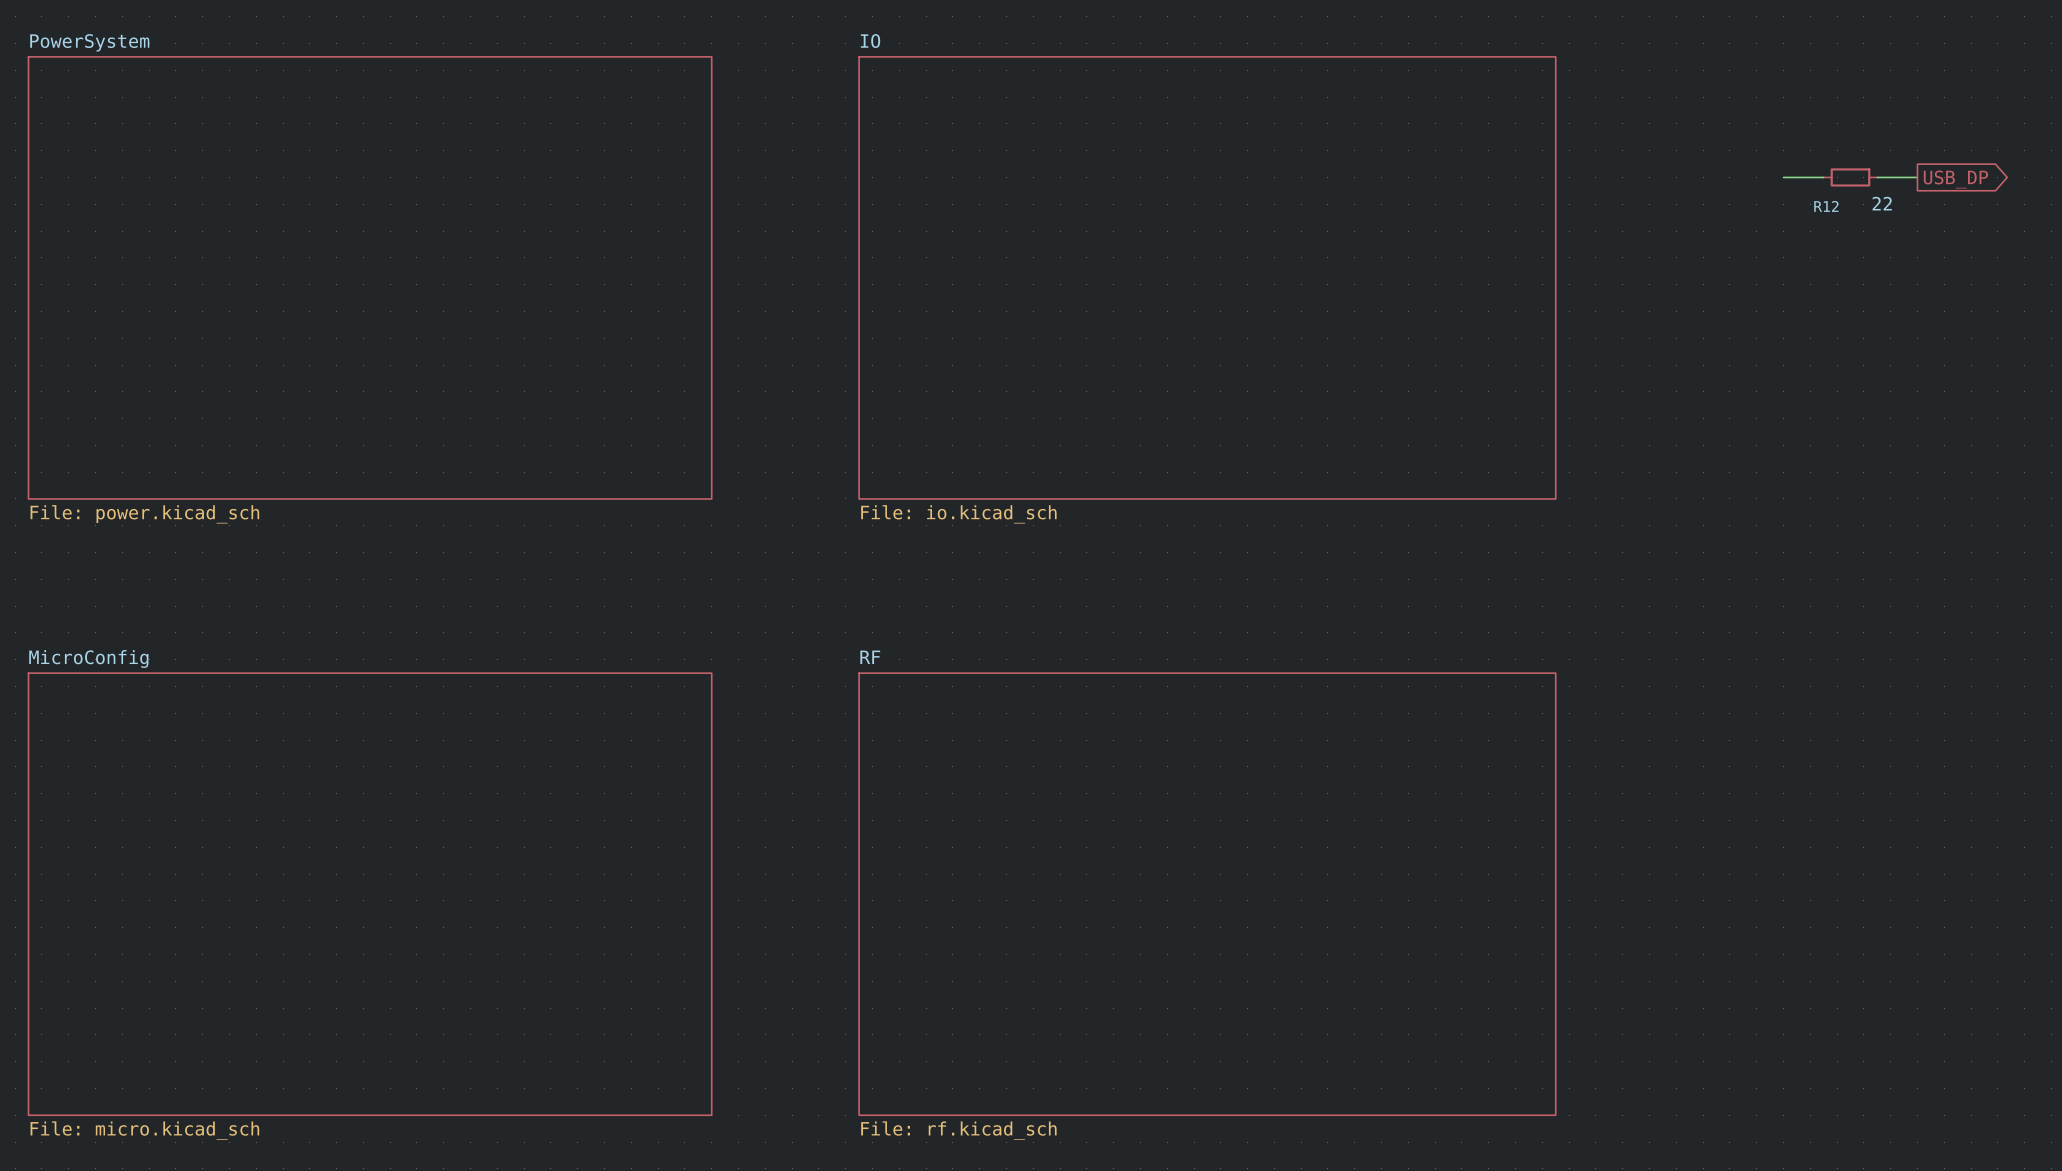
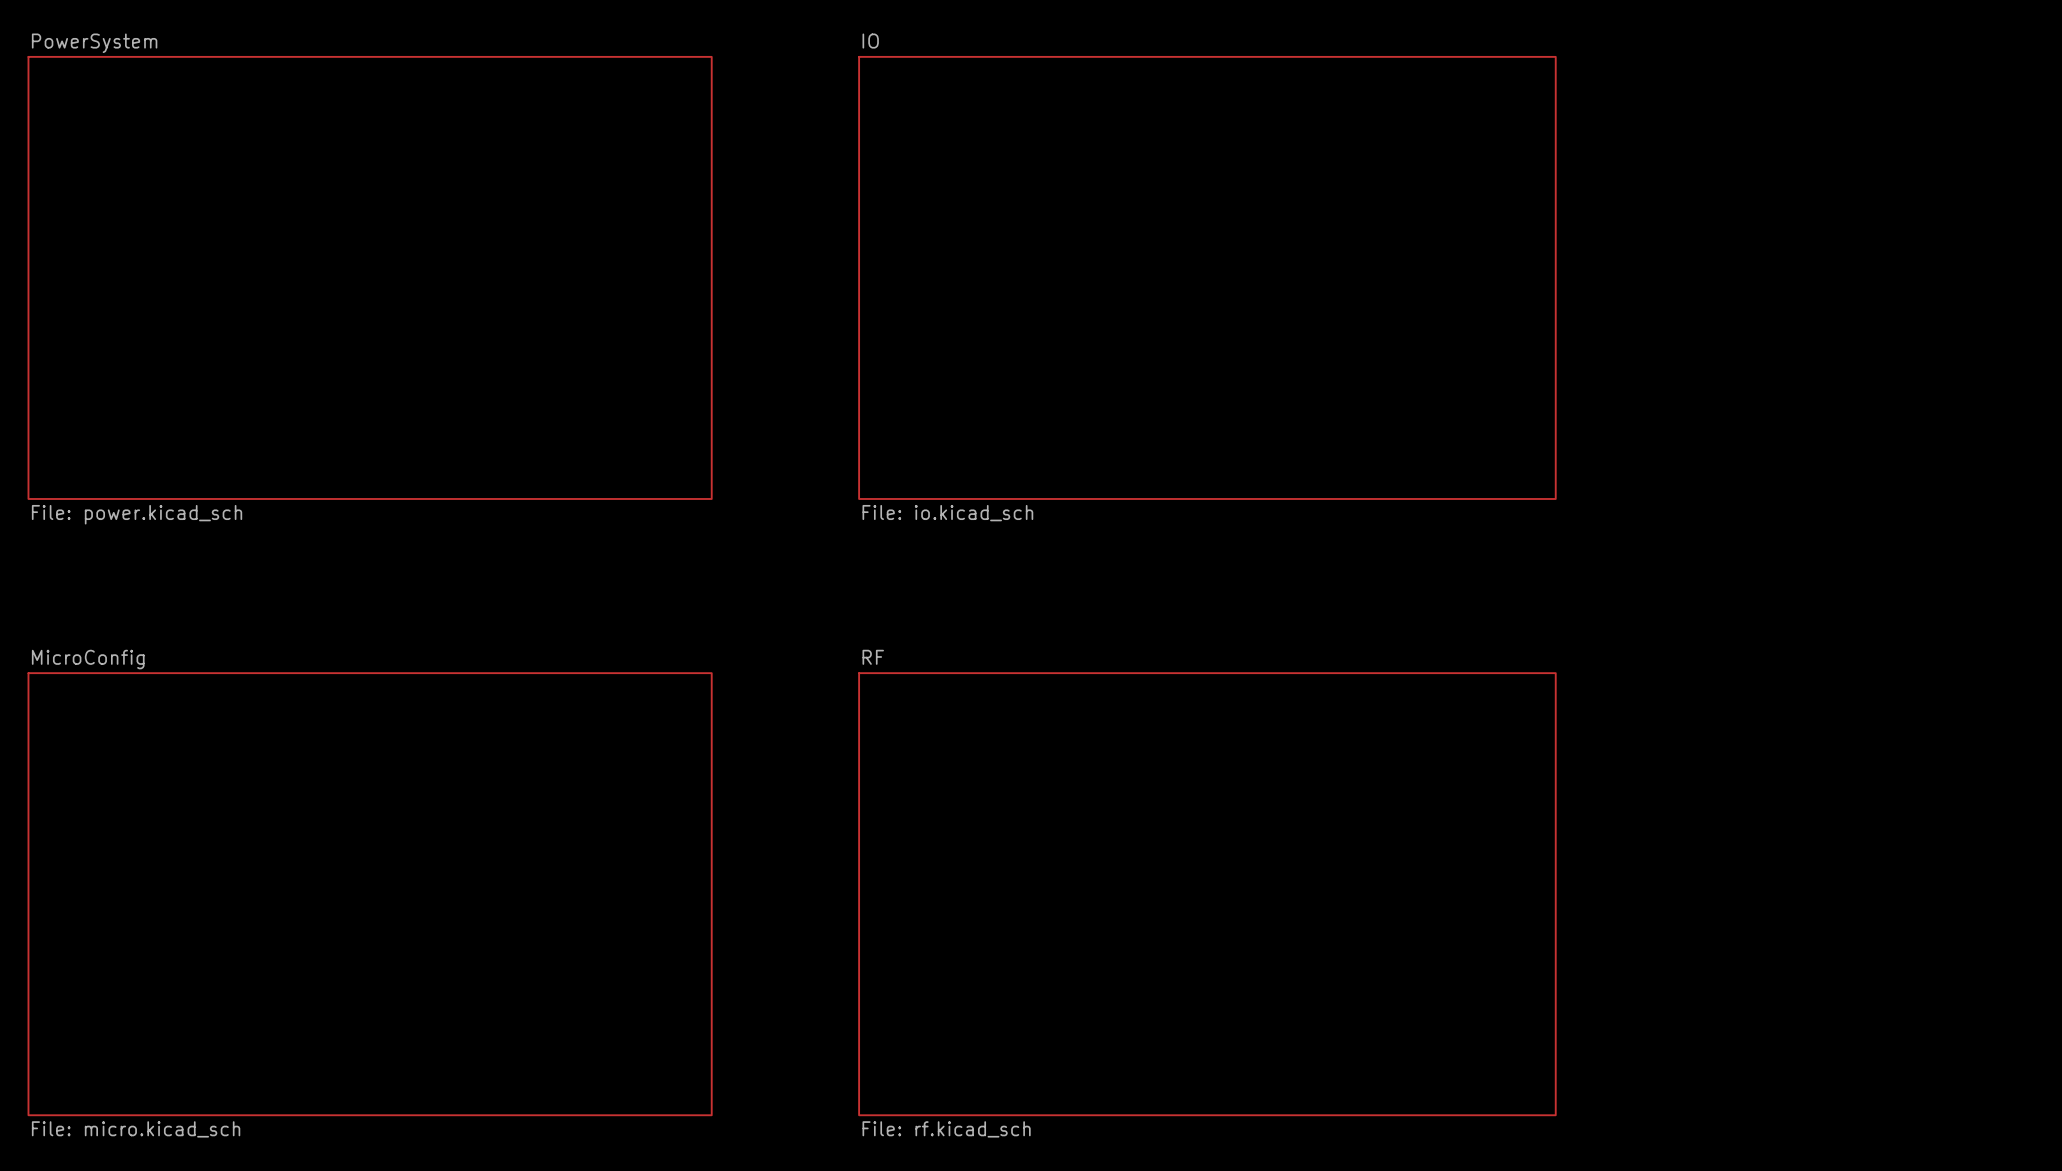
wire: (1783, 177) (1823, 177) -> none
R12: 22 (1850, 177) -> none
wire: (1877, 177) (1917, 177) -> none
global label: USB_DP (1955, 179) -> none

